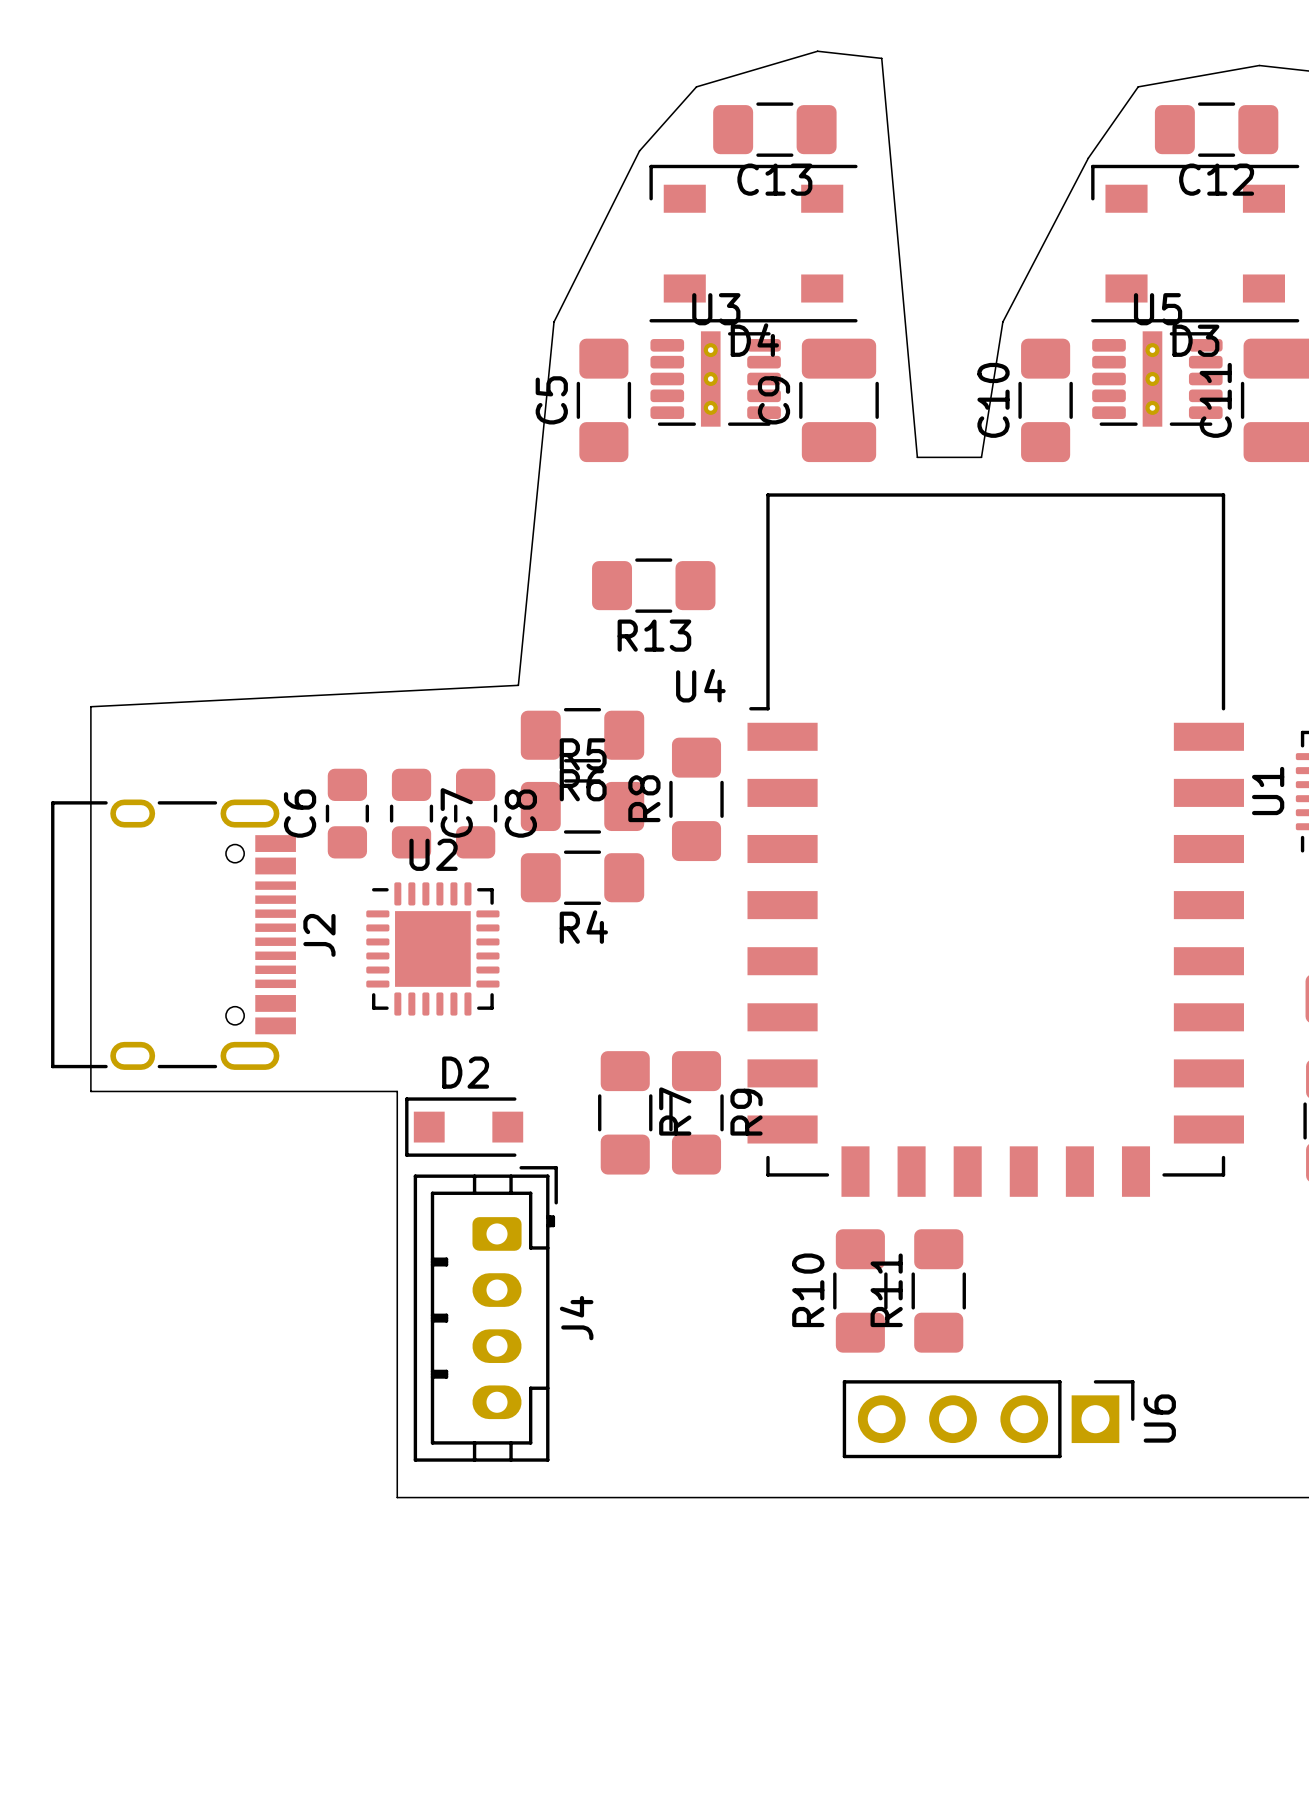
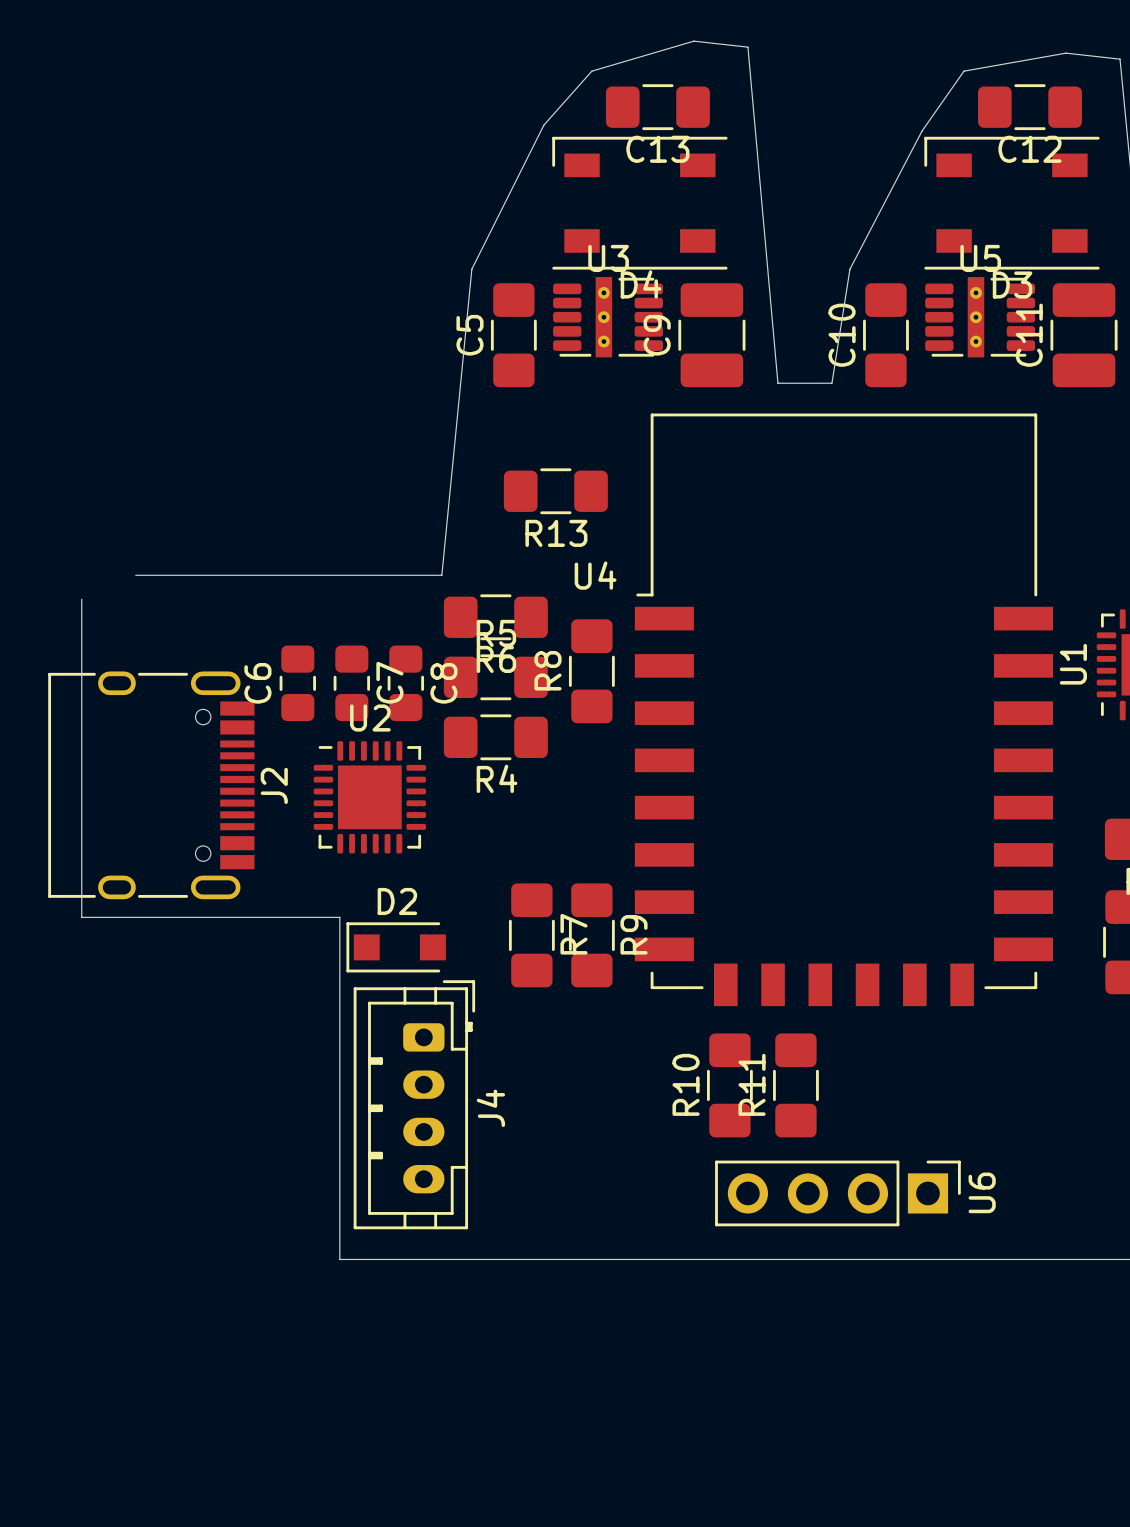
board edge: (518, 685) (90, 706) (90, 713) -> (441, 575) (135, 575)

